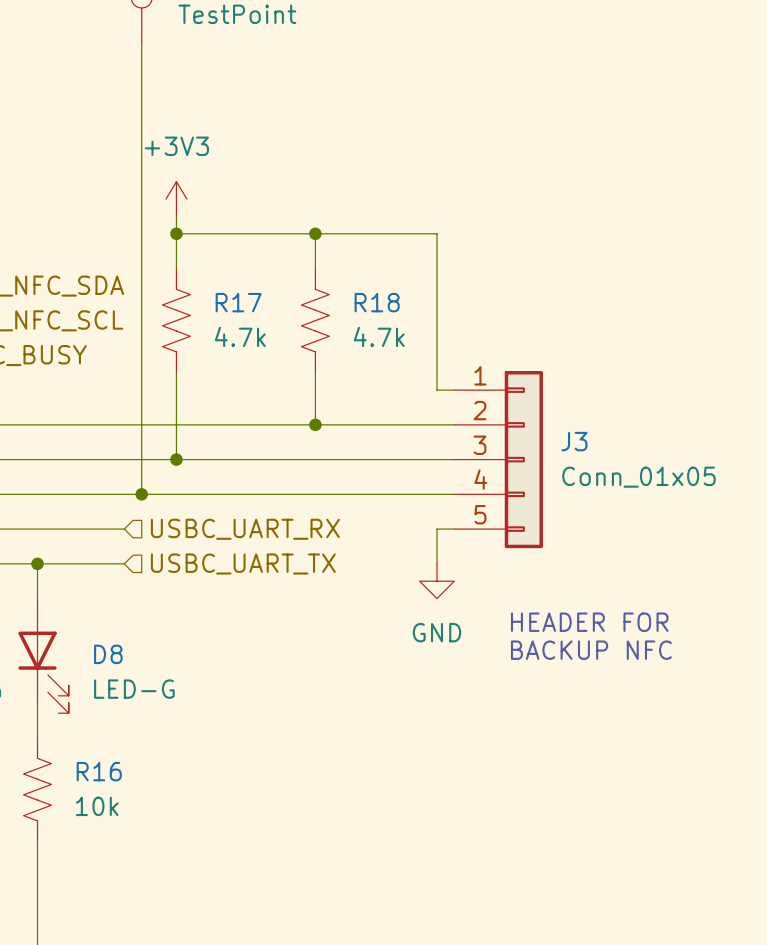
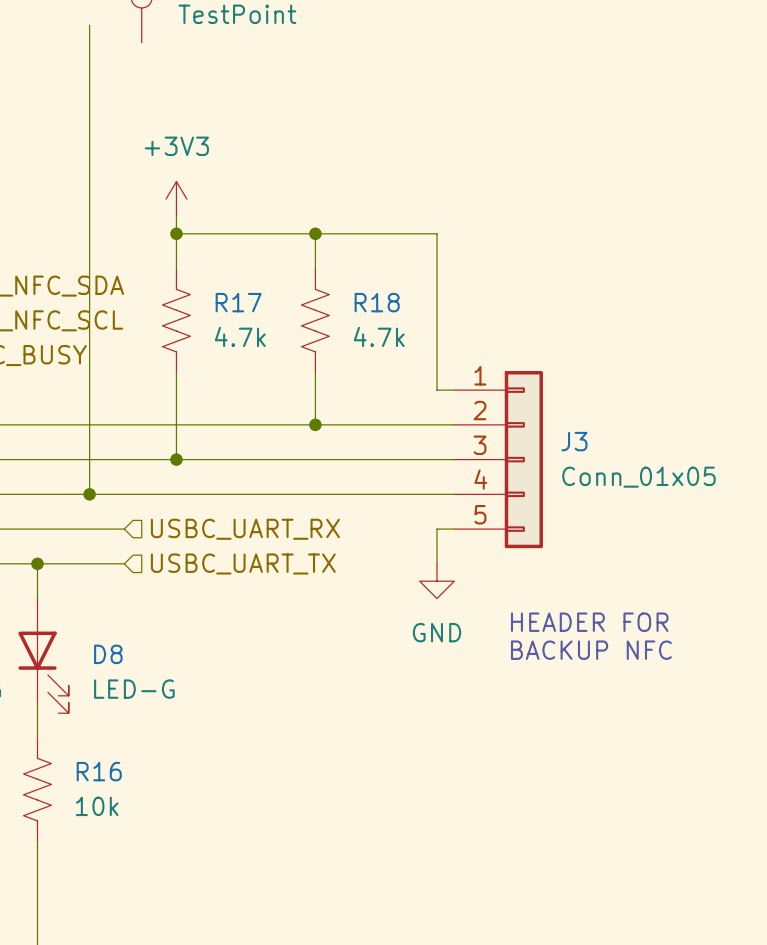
wire: none -> (89, 25) (89, 494)
wire: (141, 42) (141, 494) -> none
junction position: (141, 494) -> (89, 494)

